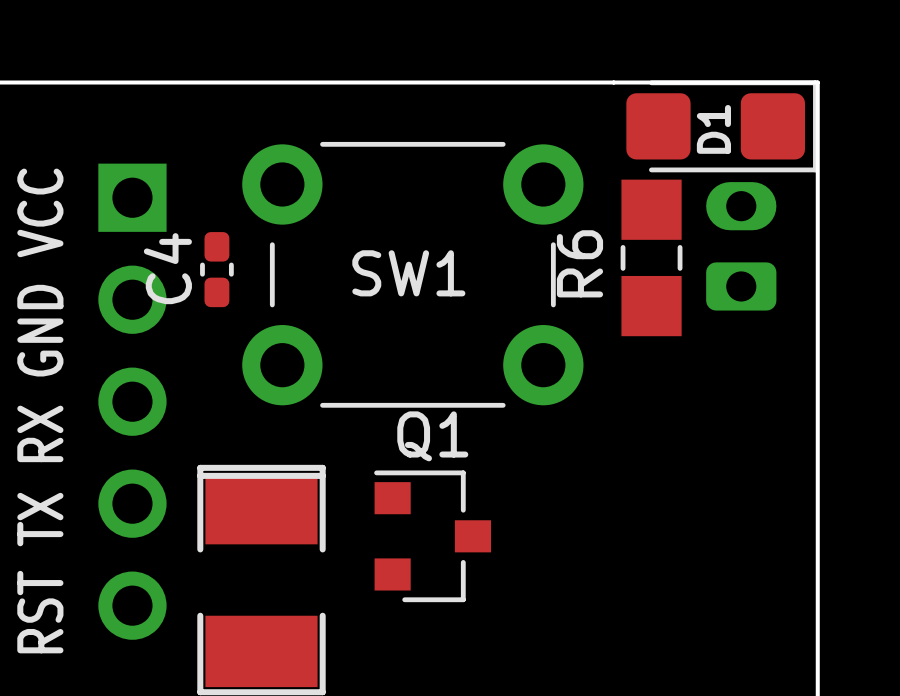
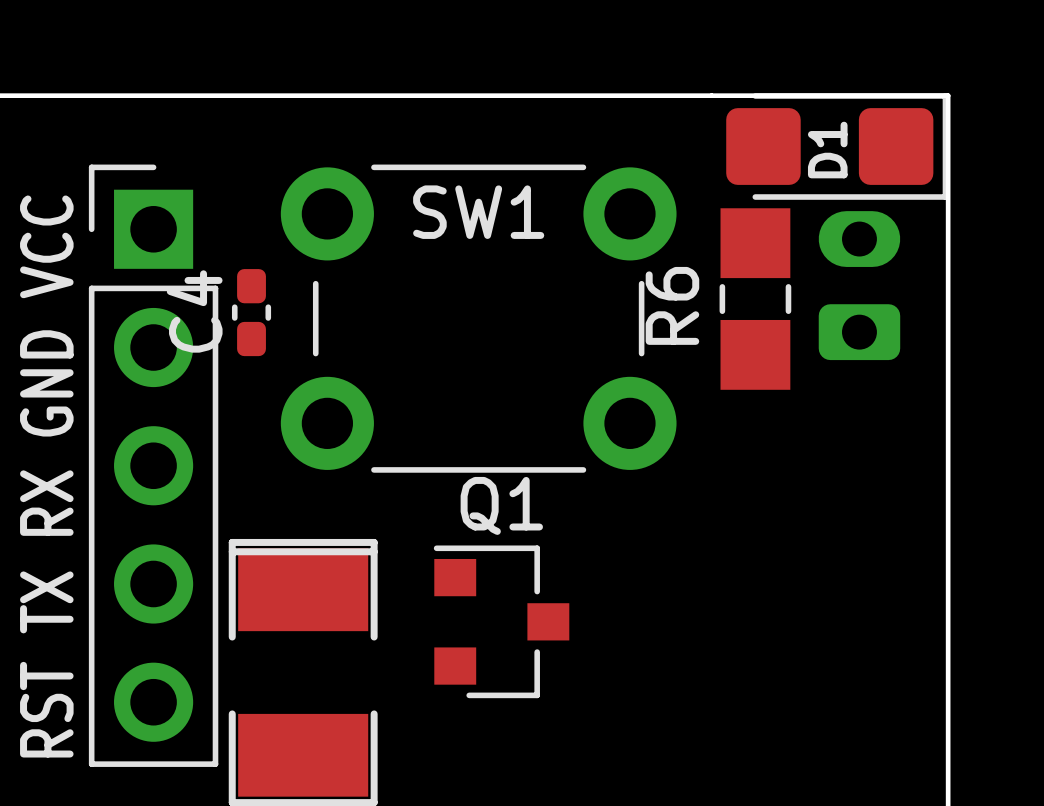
part footprint: [98, 163, 167, 640] -> [88, 164, 219, 767]
SW1 name position: SW1 (408, 273) -> SW1 (478, 212)

